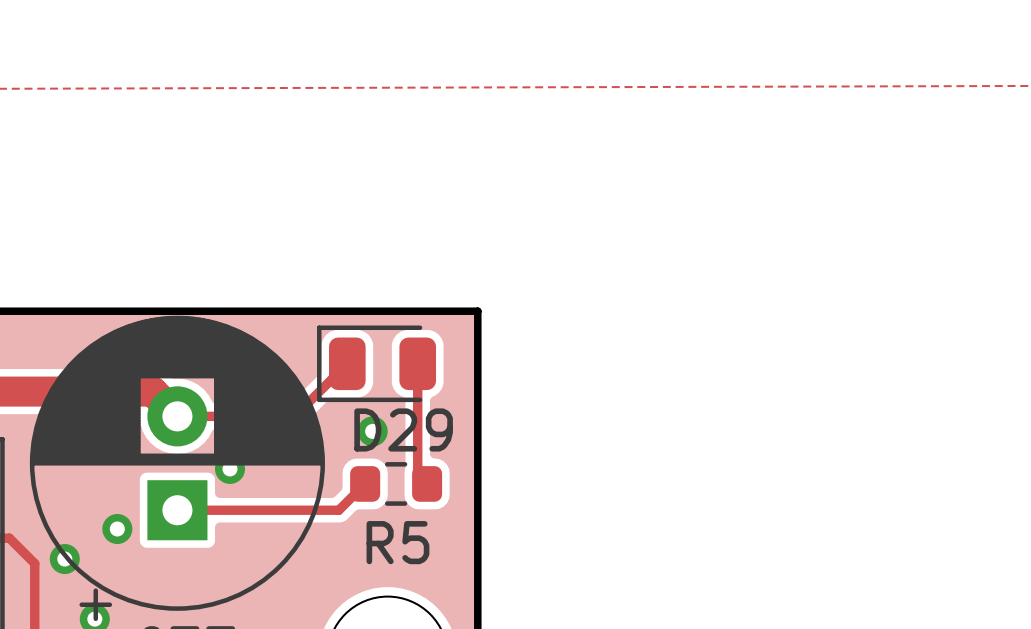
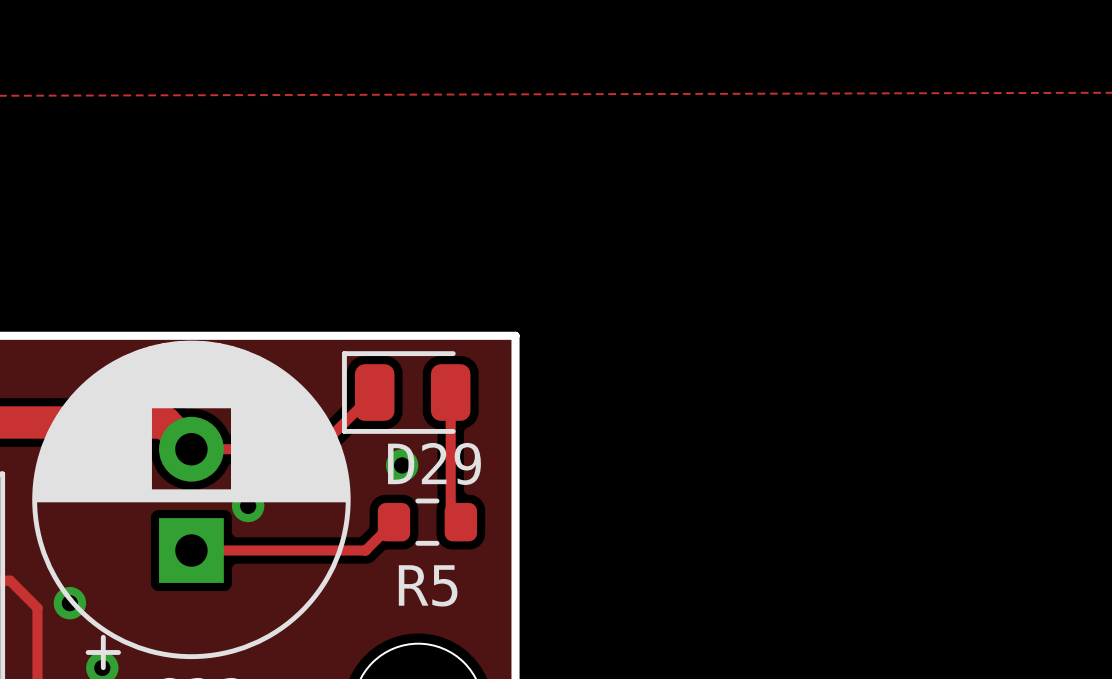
via: (117, 529) -> none

